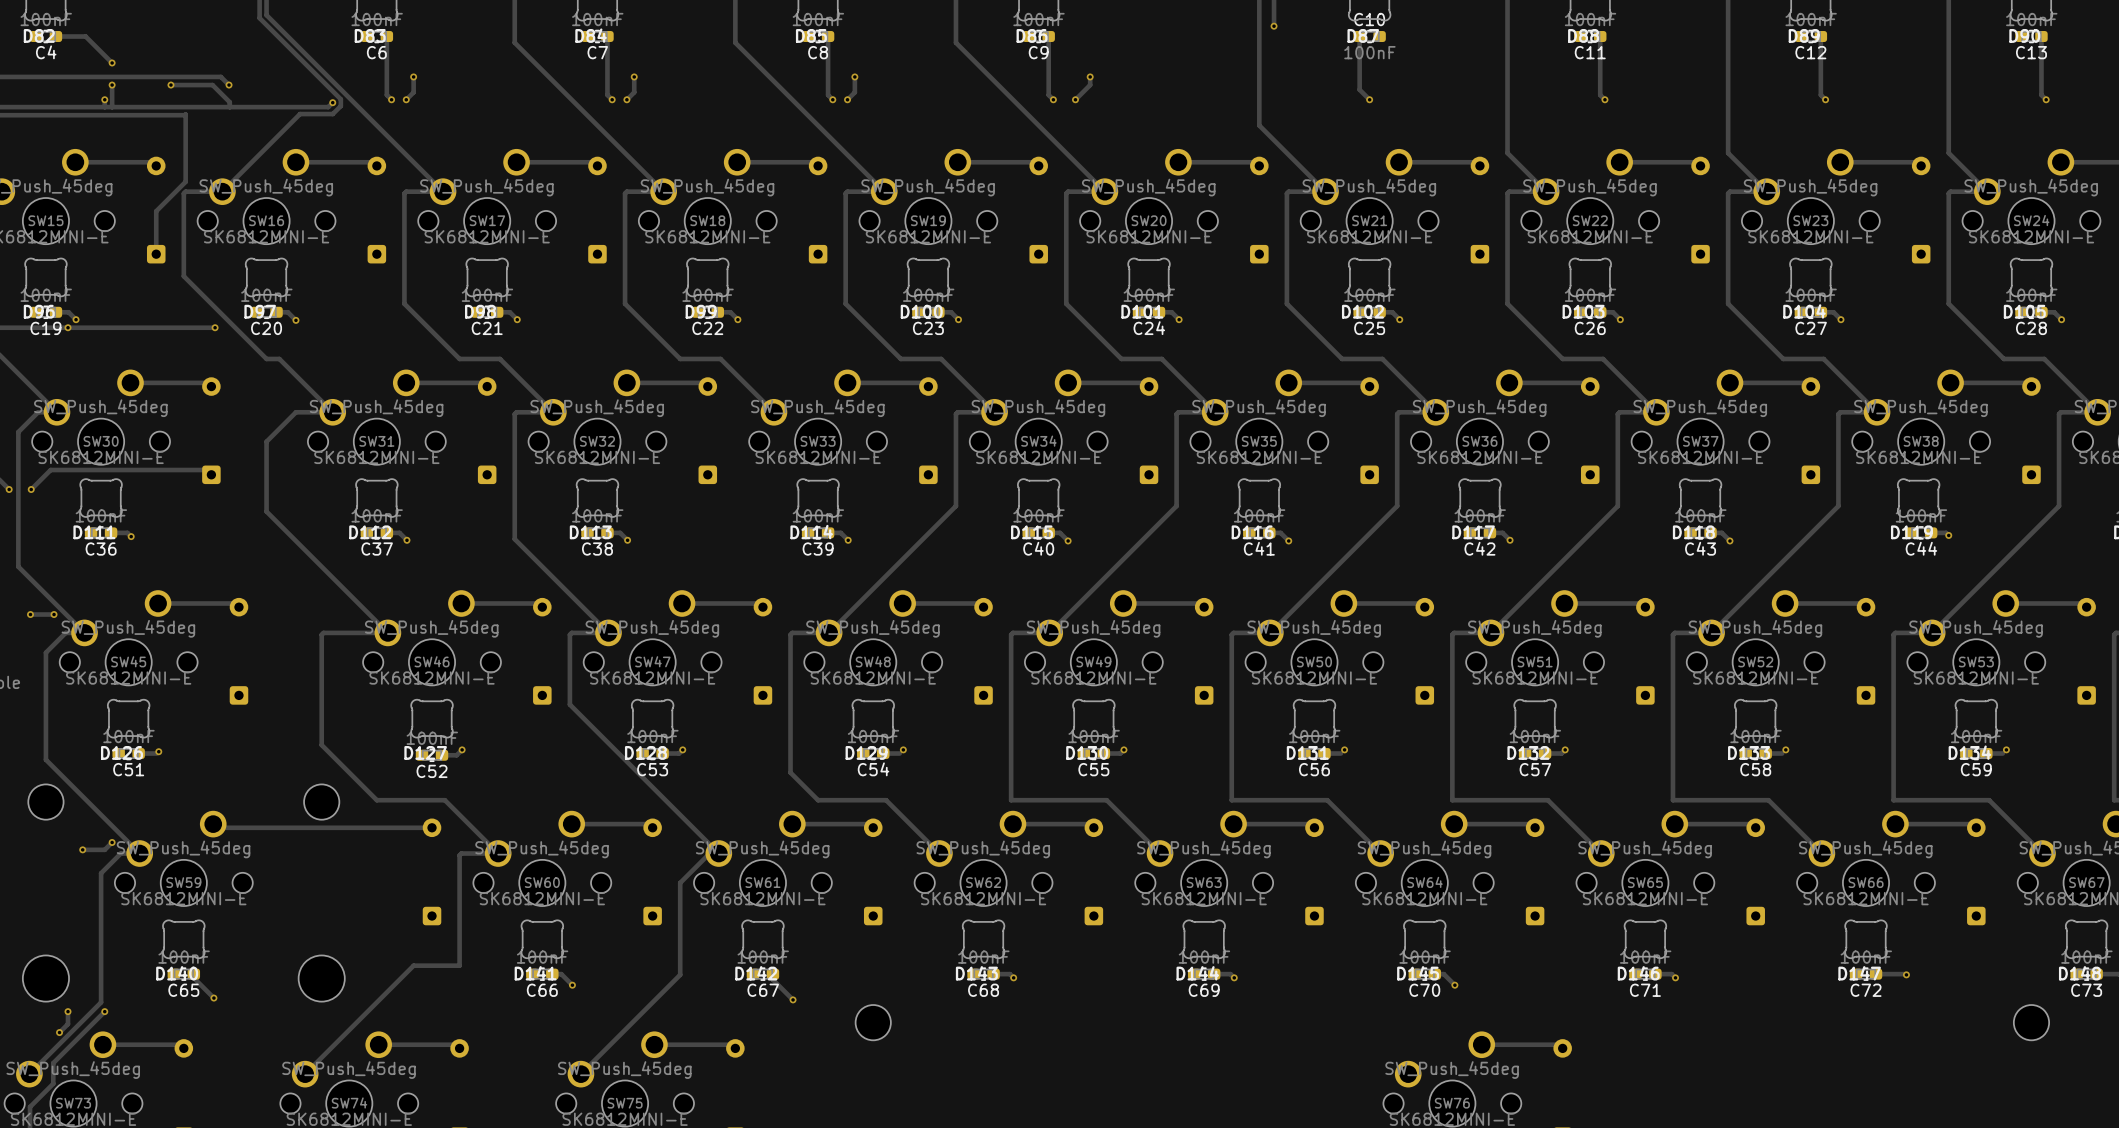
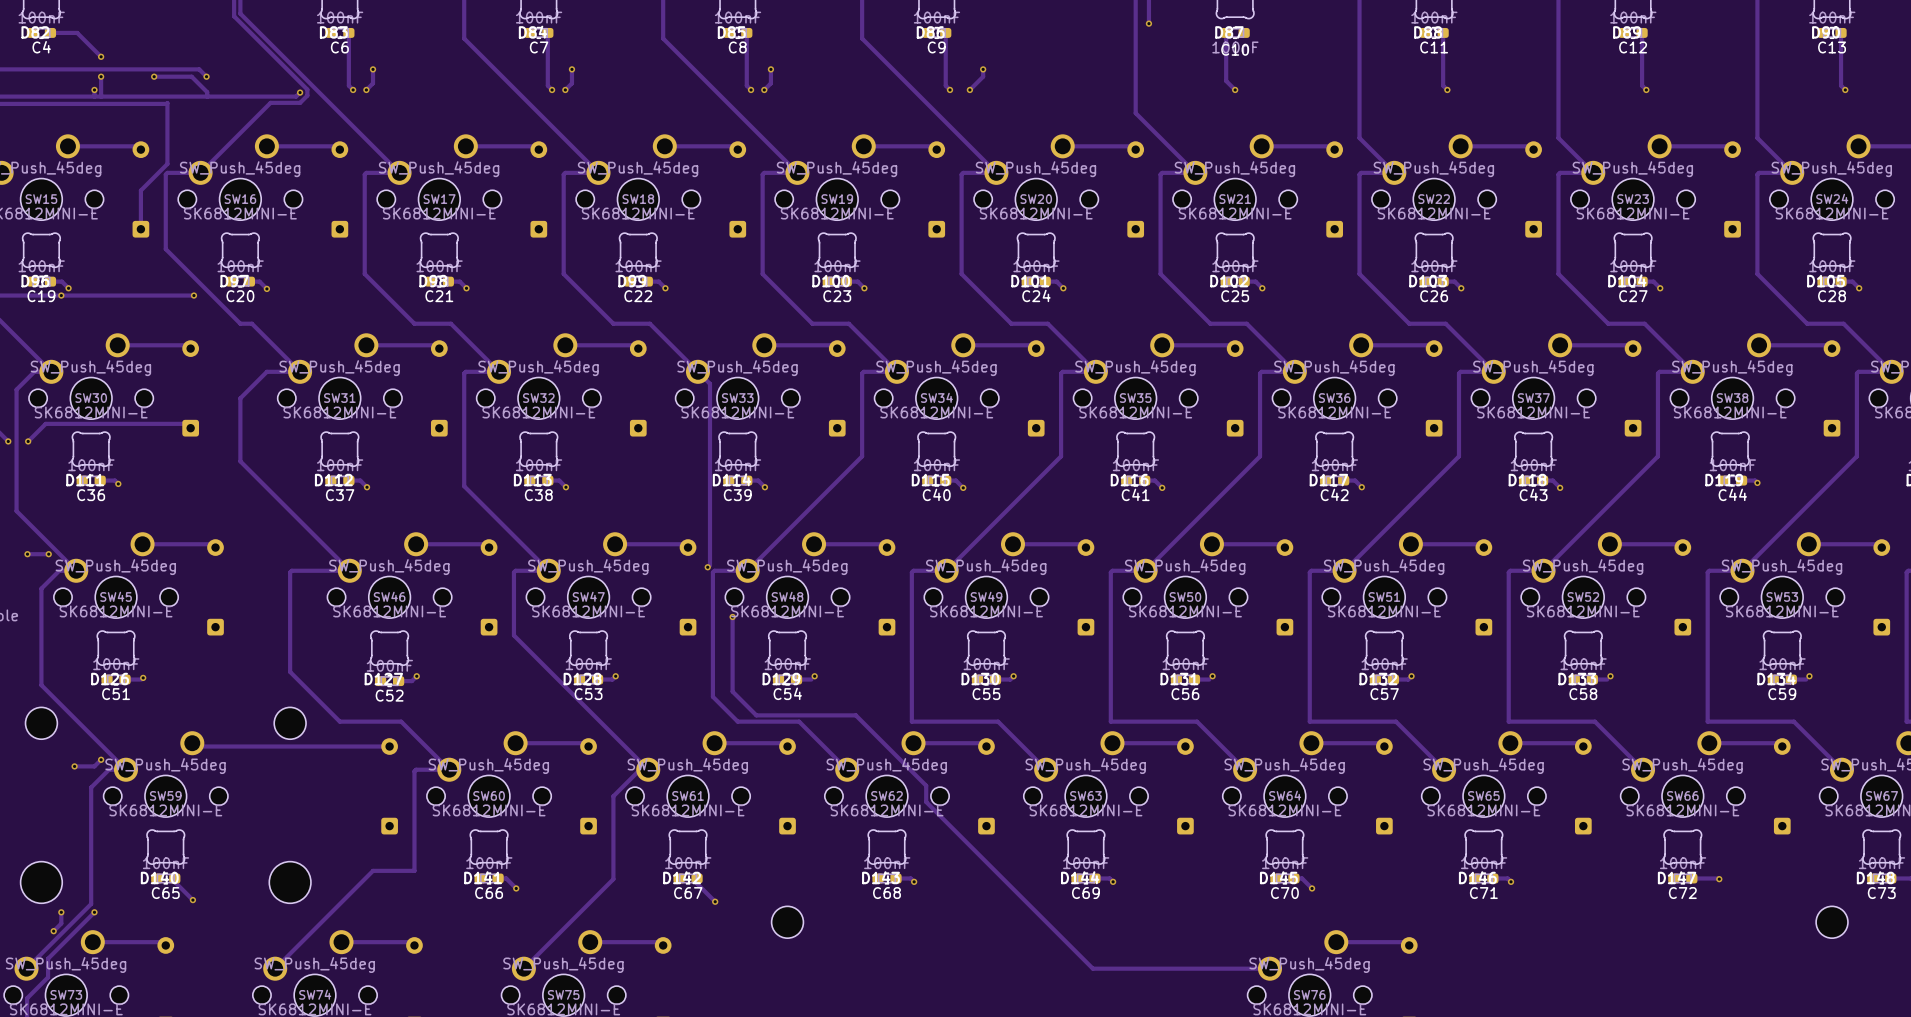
C10 name position: C10 (1369, 19) -> C10 (1235, 49)
track: none -> (697, 371) (709, 383) (709, 565) (707, 567)
via: none -> (707, 567)
track: none -> (732, 617) (732, 691) (756, 715) (855, 715) (926, 785) (926, 801) (1092, 968) (1269, 968)
via: none -> (732, 617)

